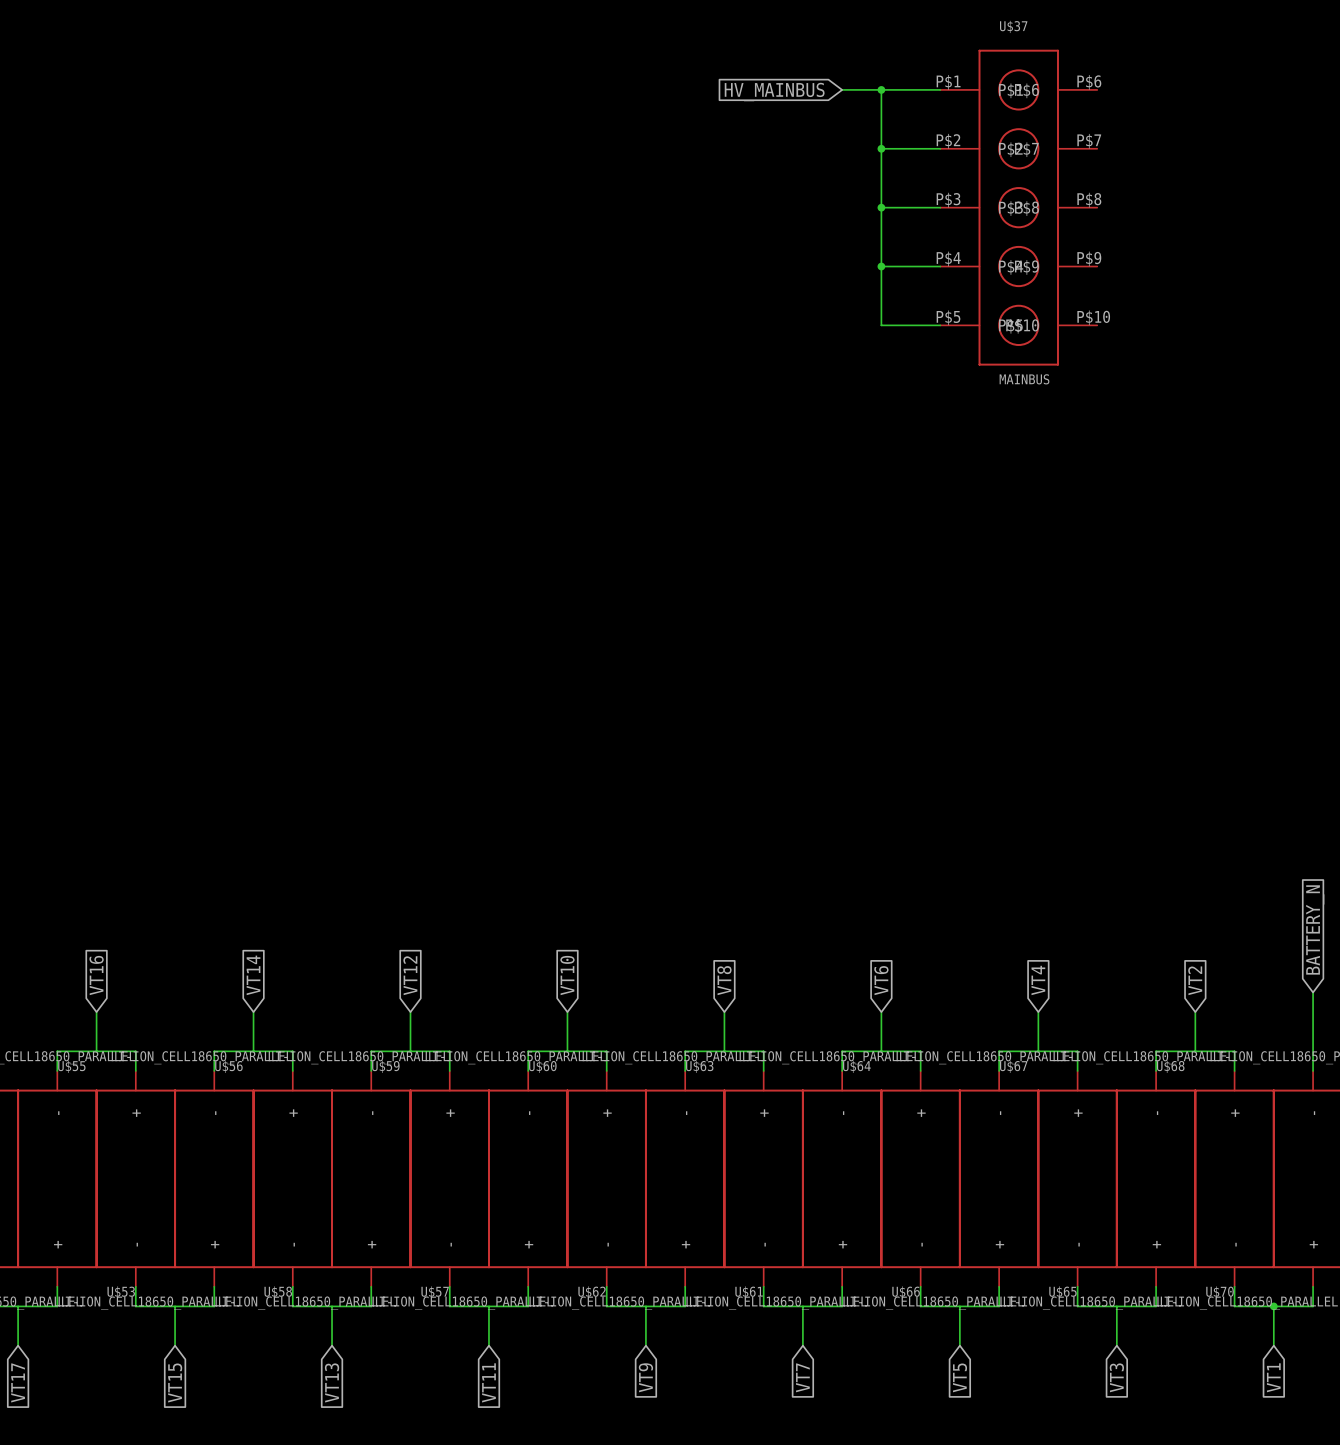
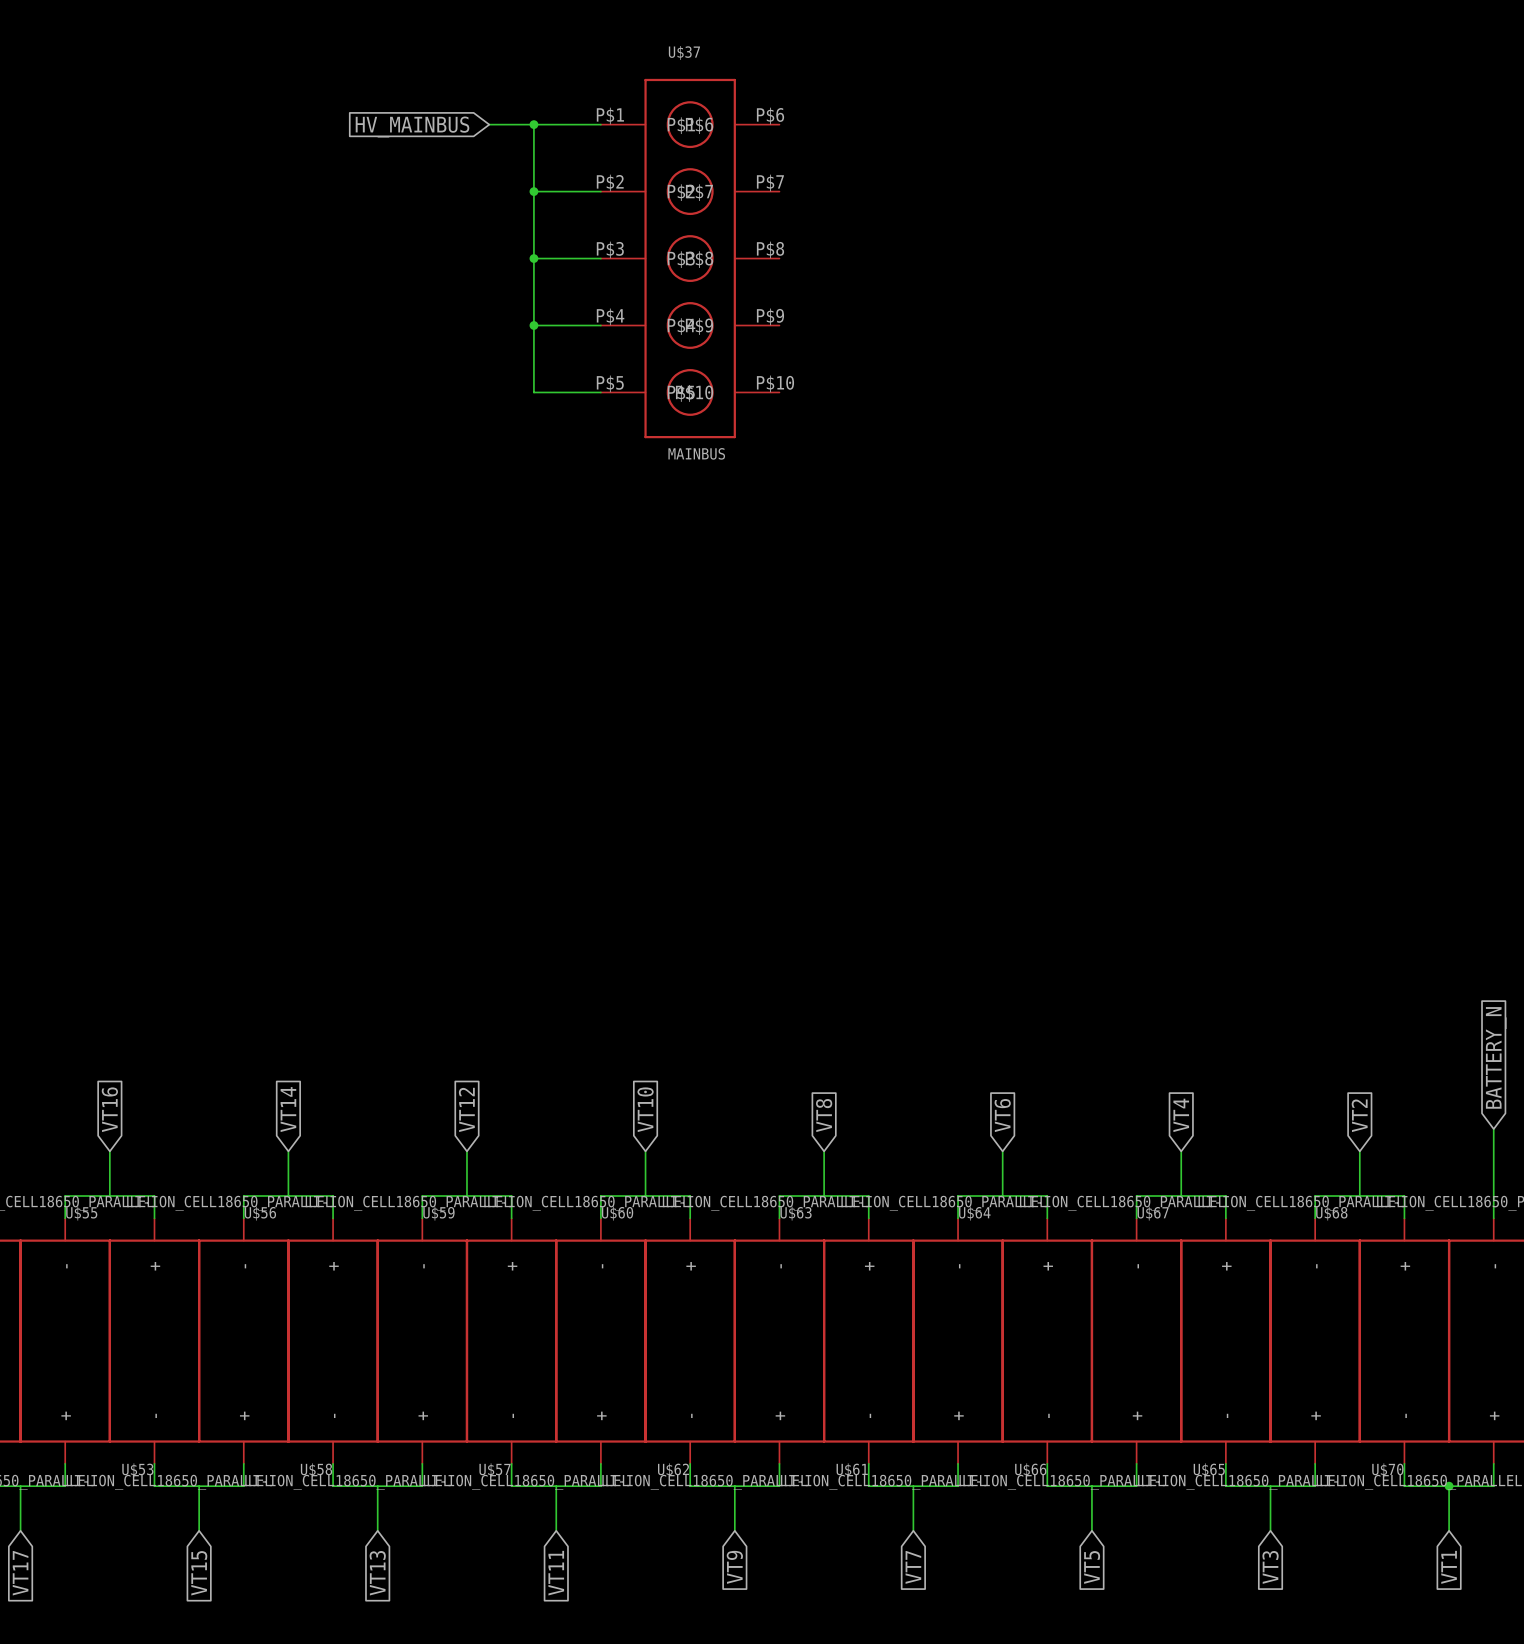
wire: (842, 89) (940, 89) -> none
wire: (881, 89) (881, 325) (940, 325) -> none
junction: (881, 89) -> none
global label: HV_MAINBUS (774, 92) -> none
wire: none -> (489, 124) (600, 124)
wire: none -> (533, 124) (533, 392) (600, 392)
junction: none -> (533, 124)
global label: none -> HV_MAINBUS (412, 127)
wire: (881, 148) (940, 148) -> none
junction: (881, 148) -> none
wire: none -> (533, 191) (600, 191)
junction: none -> (533, 191)
wire: (881, 207) (940, 207) -> none
junction: (881, 207) -> none
U$37 position: (1018, 207) -> (690, 258)
wire: none -> (533, 258) (600, 258)
junction: none -> (533, 258)
wire: (881, 266) (940, 266) -> none
junction: (881, 266) -> none
wire: none -> (533, 325) (600, 325)
junction: none -> (533, 325)

